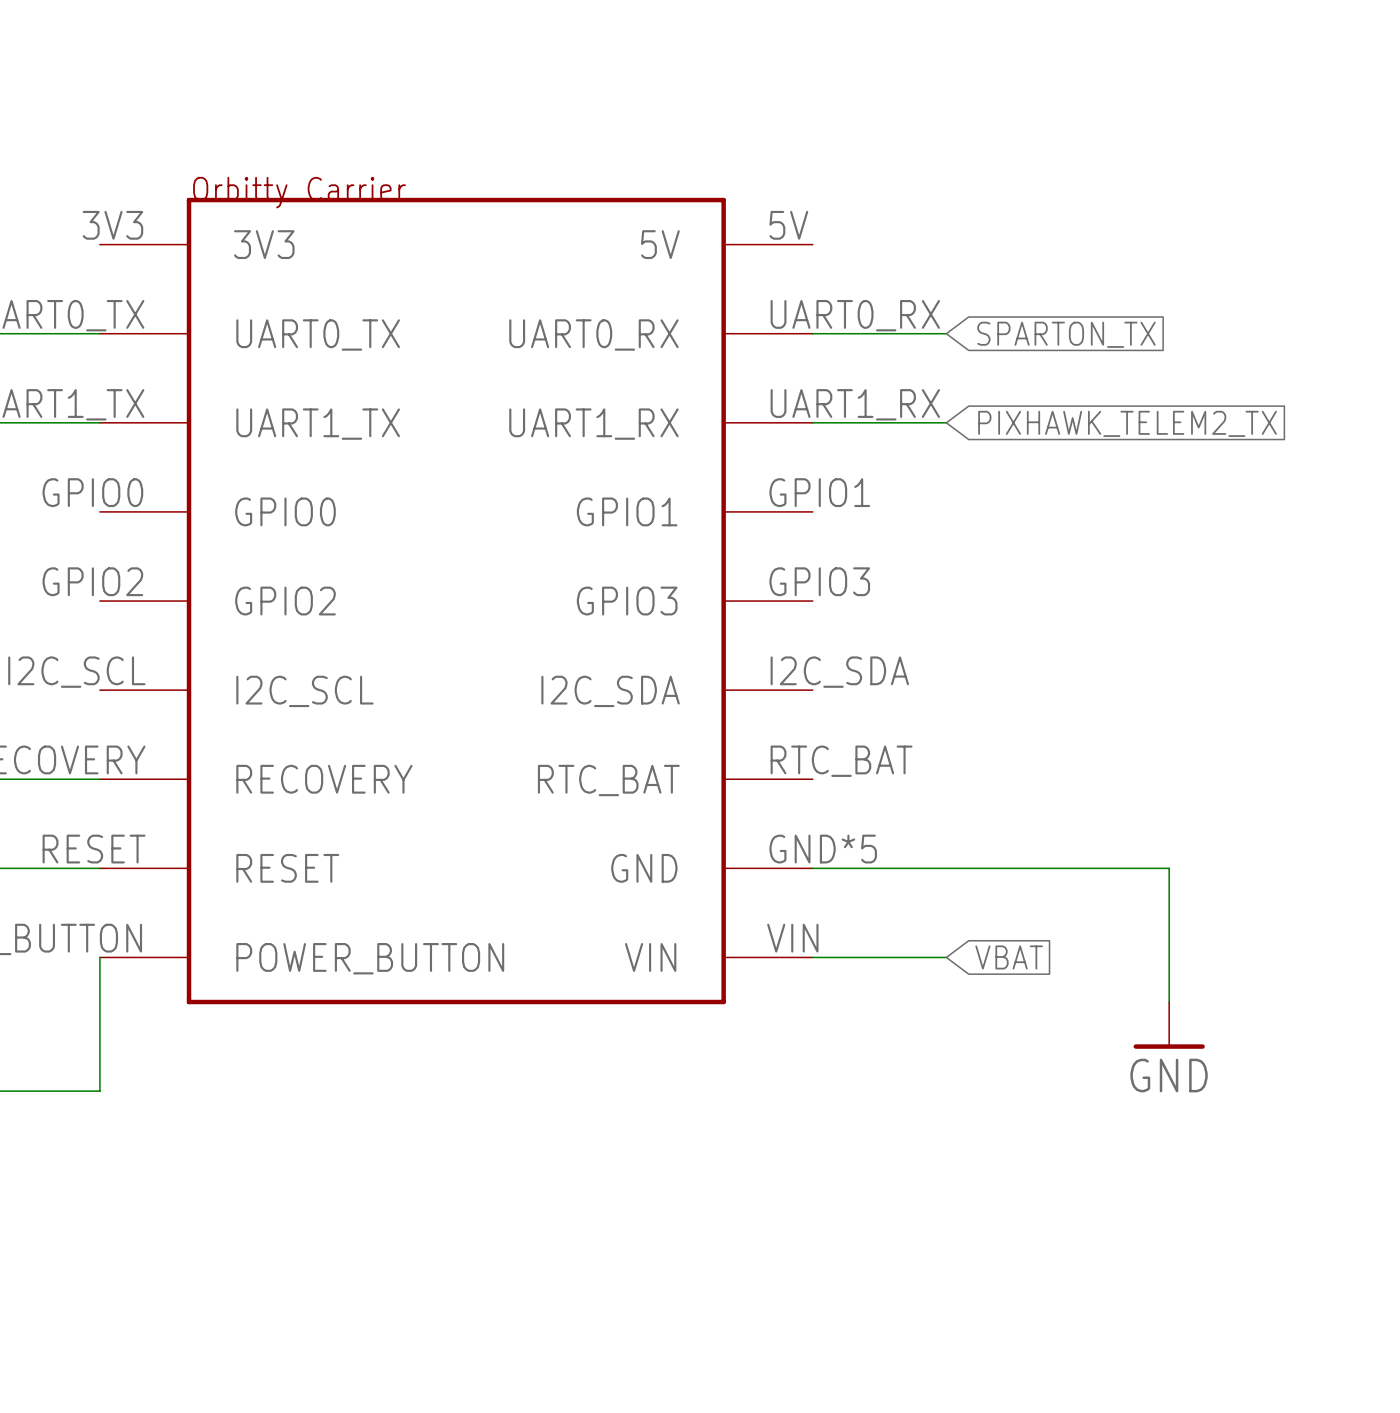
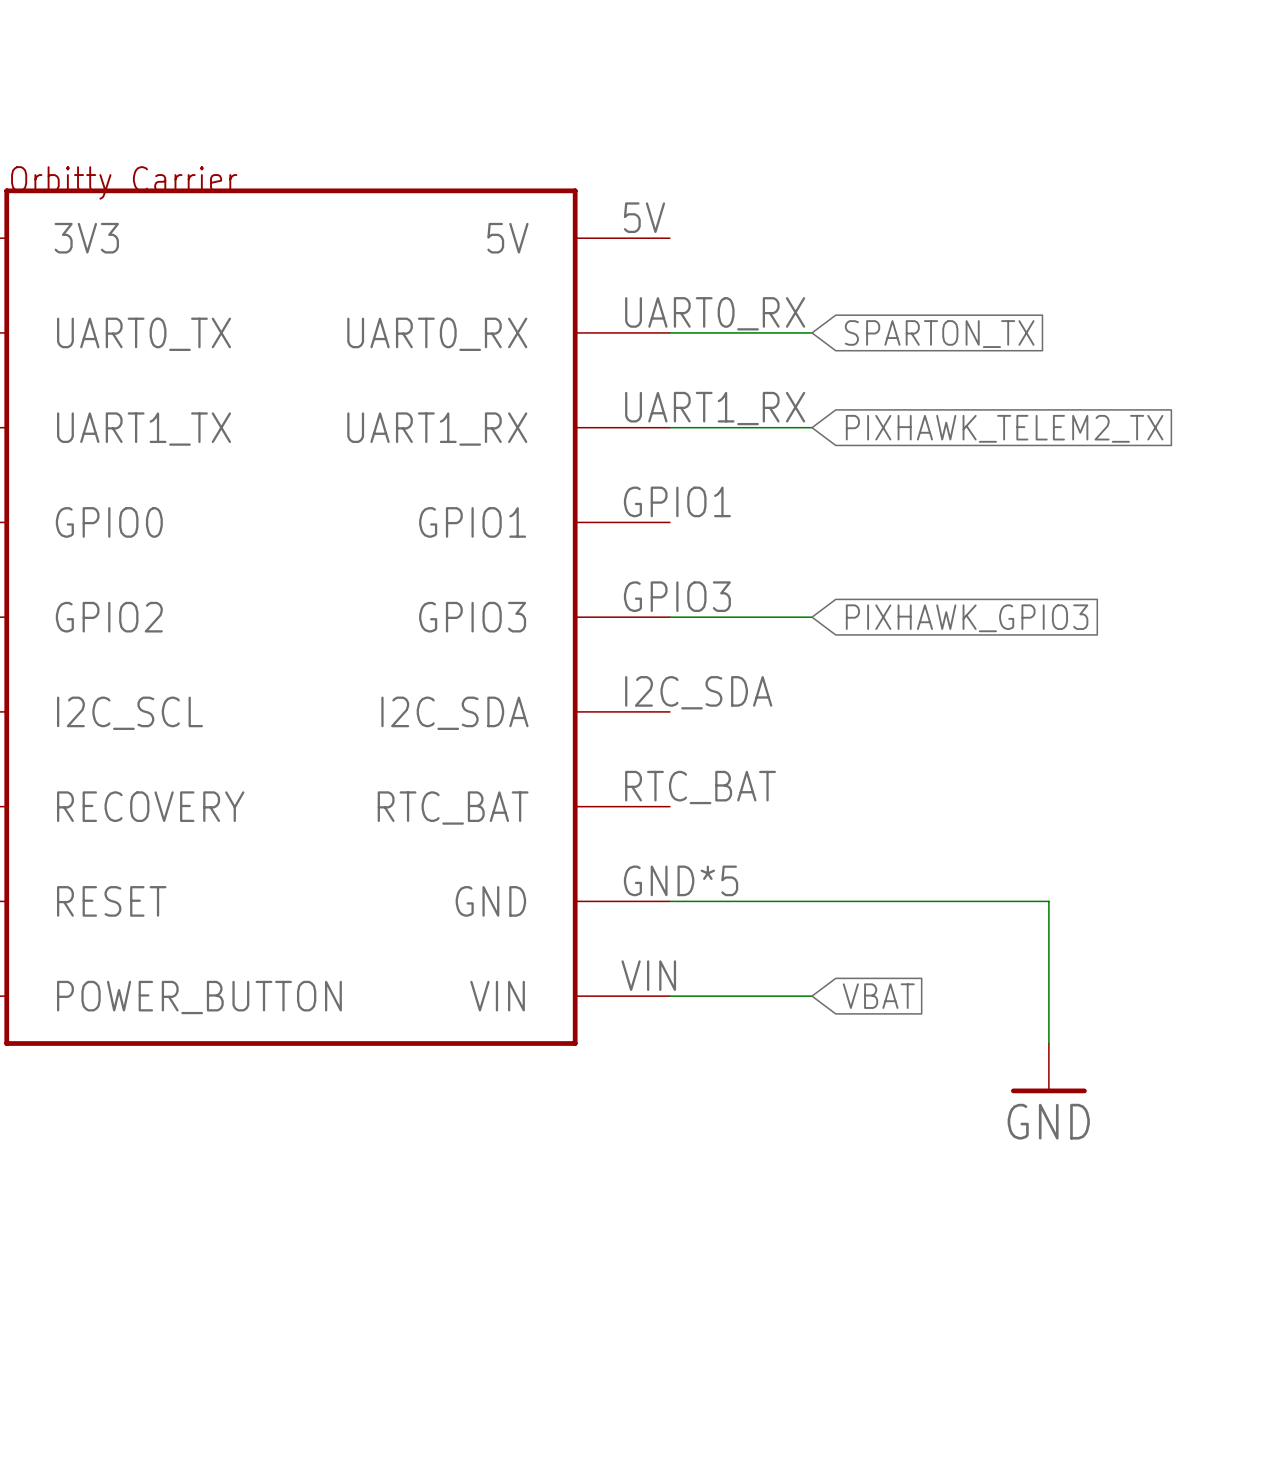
wire: none -> (669, 617) (812, 617)
global label: none -> PIXHAWK_GPIO3 (967, 618)

